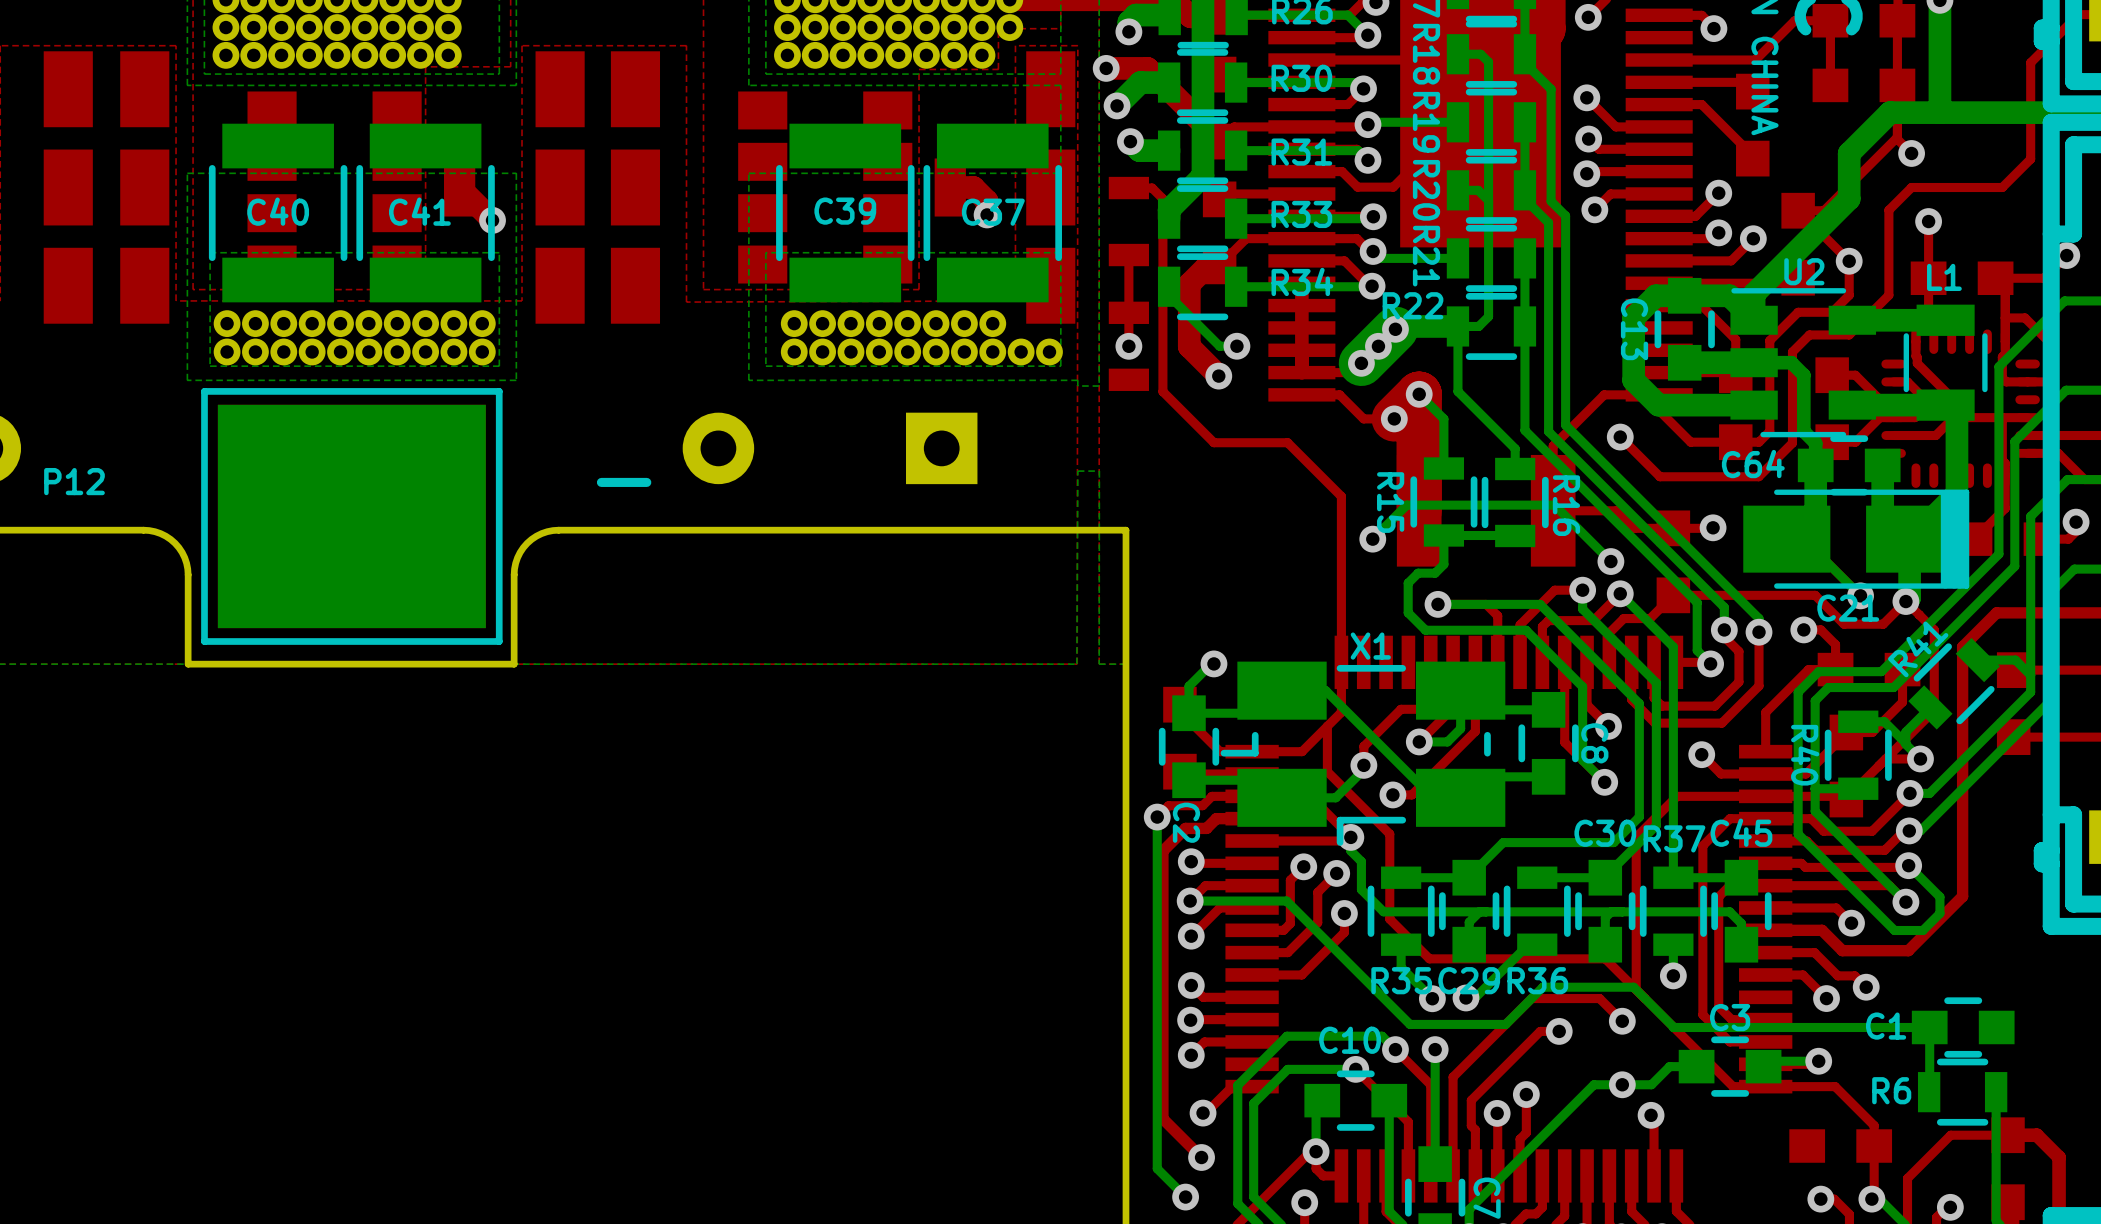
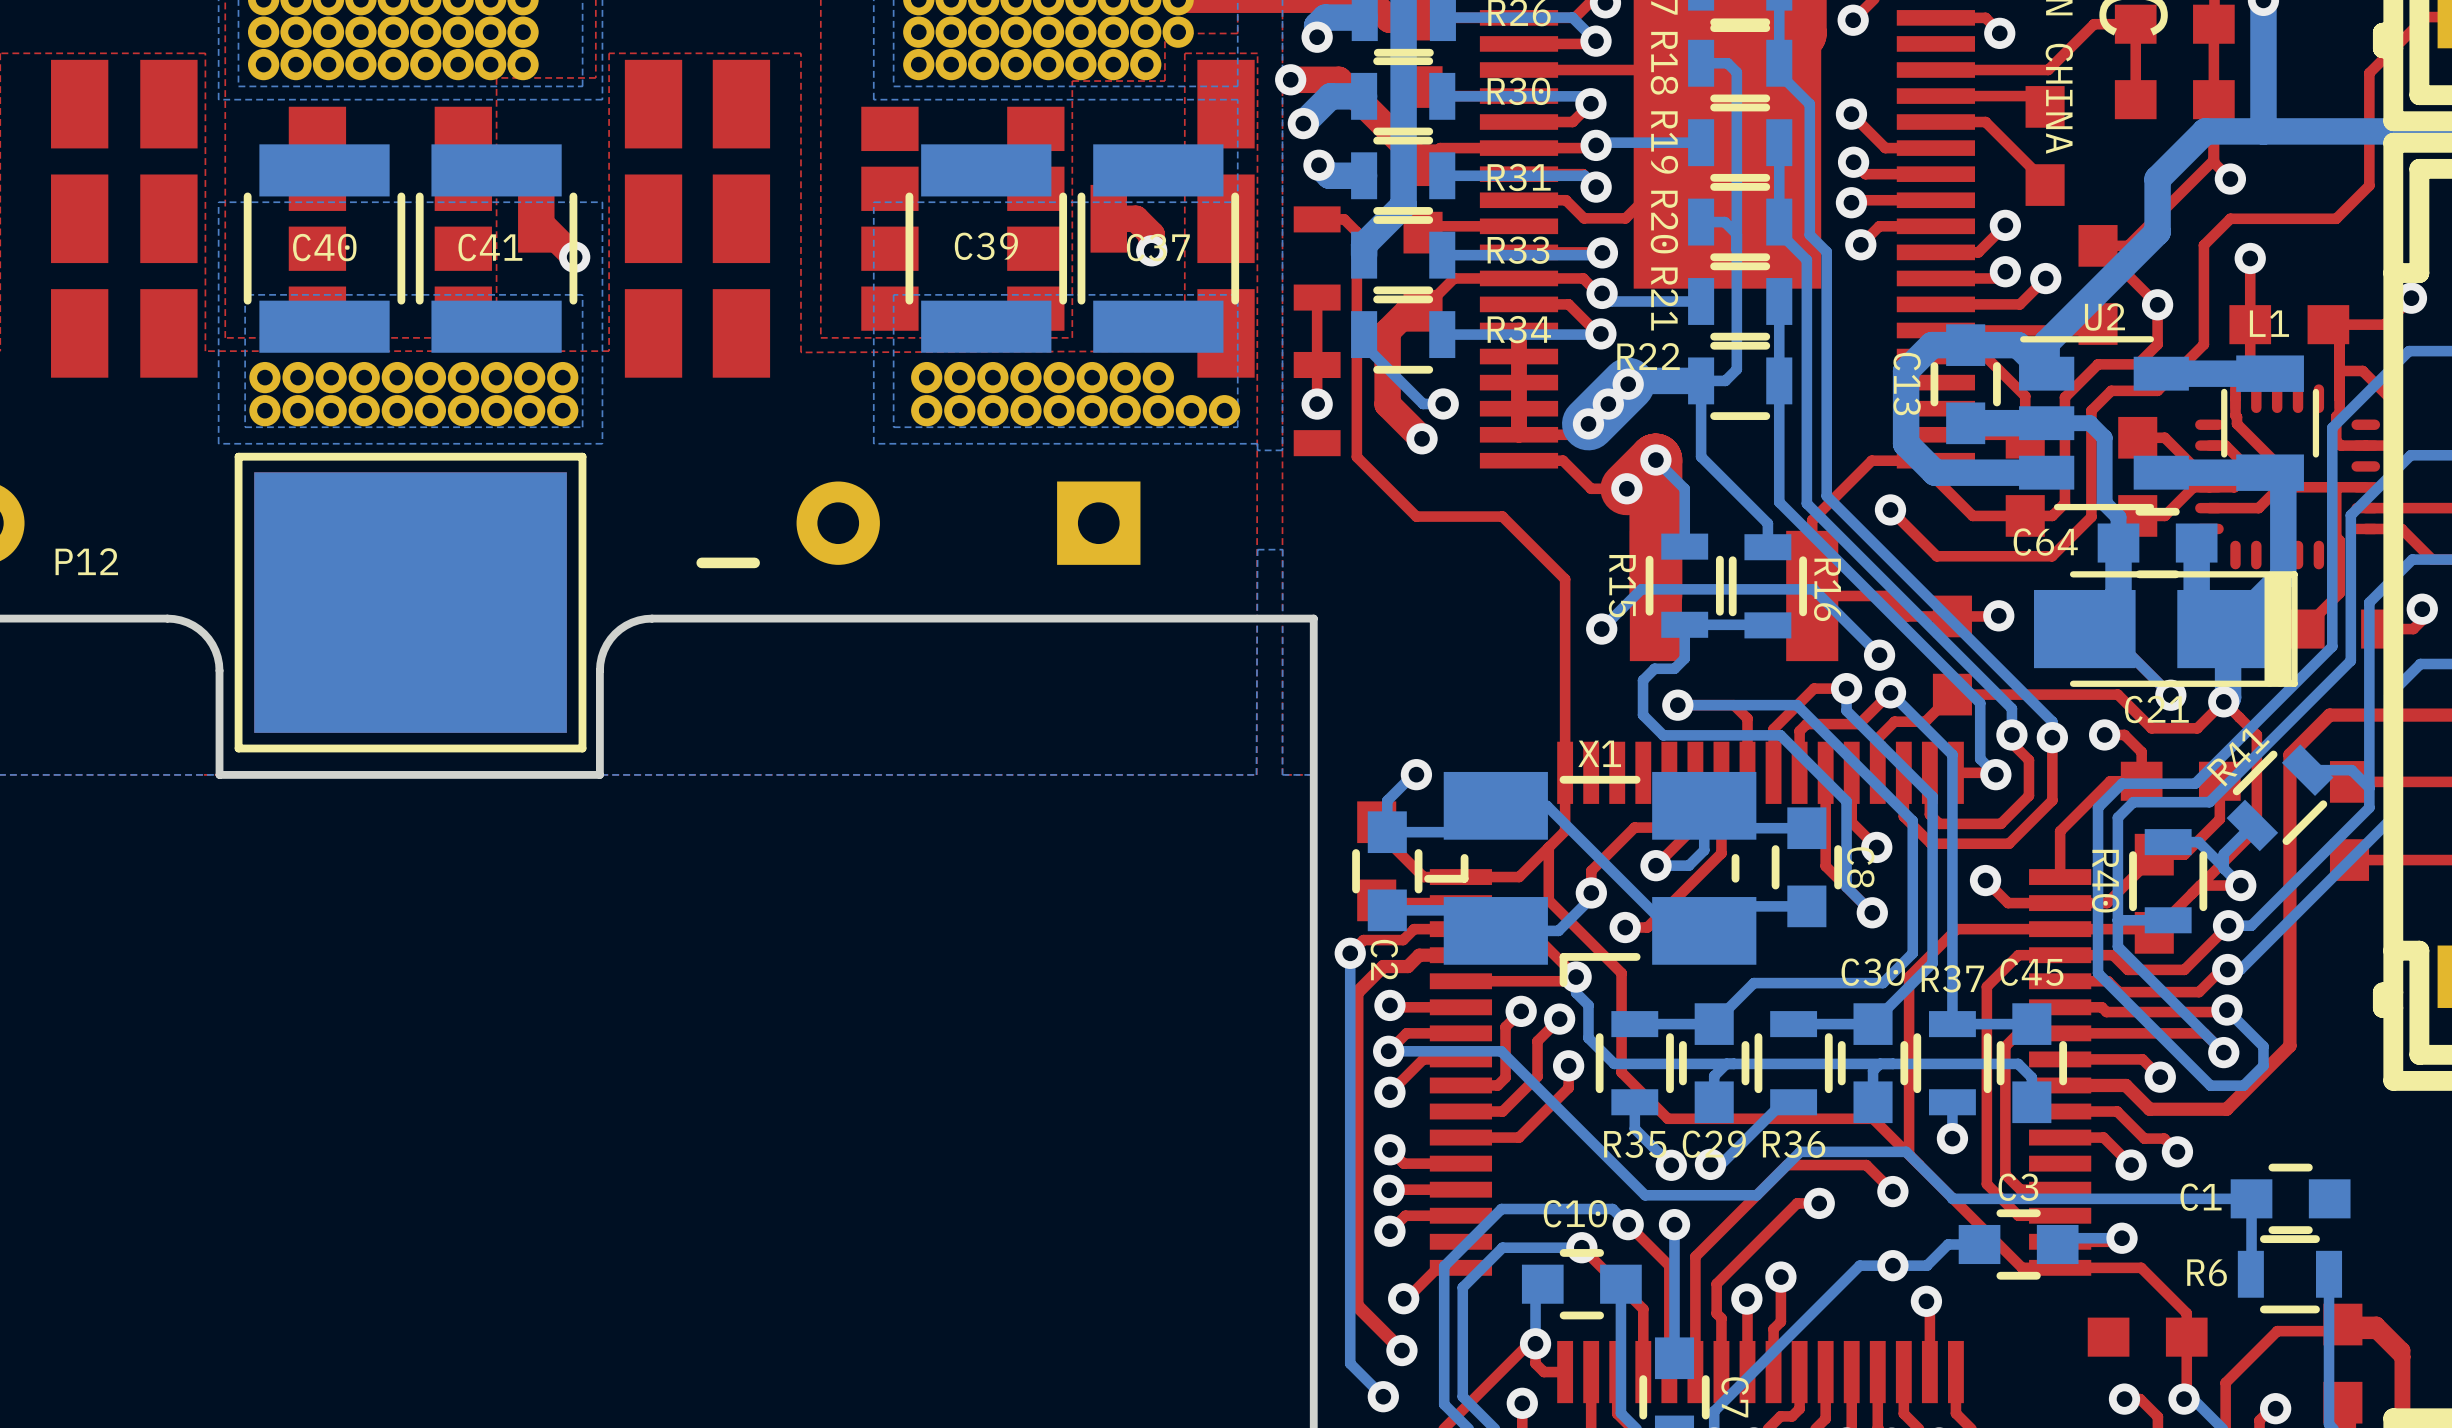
top track: (2002, 1135) (1950, 1135) (1907, 1178) (1907, 1185) -> (2402, 1357) (2376, 1331) (2277, 1331) (2225, 1382)

